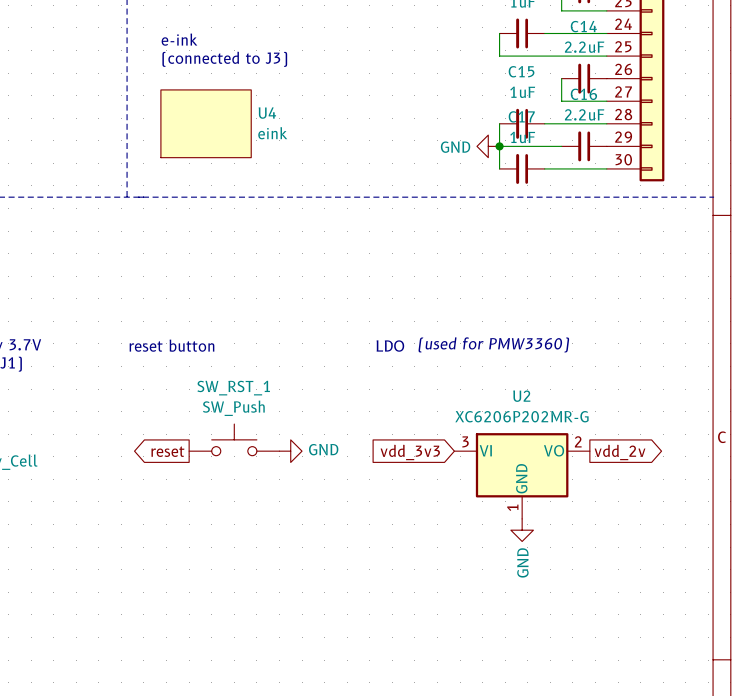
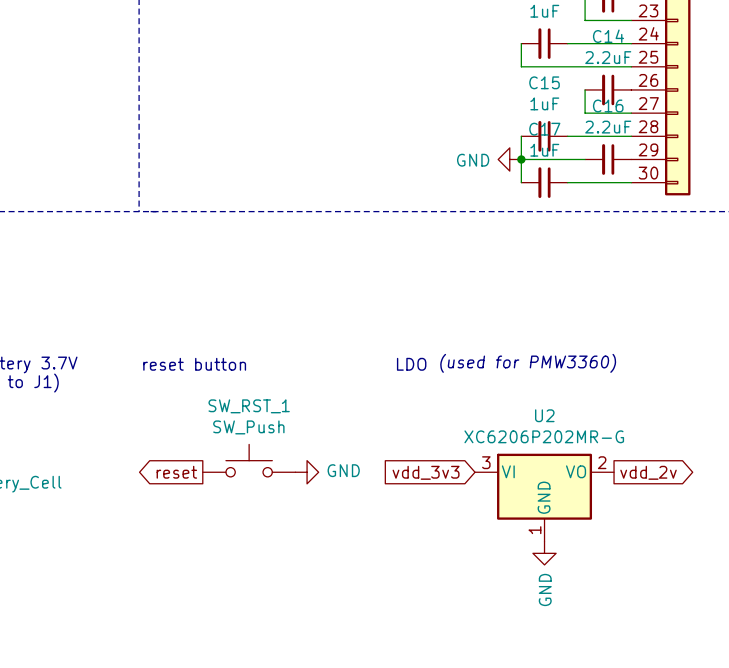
text: e-ink (179, 39) -> none
text: (connected to J3) (224, 59) -> none
U4: eink (206, 123) -> none

